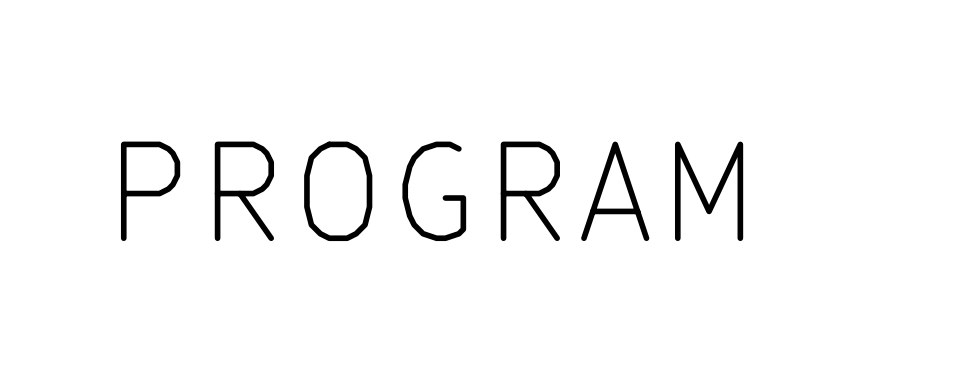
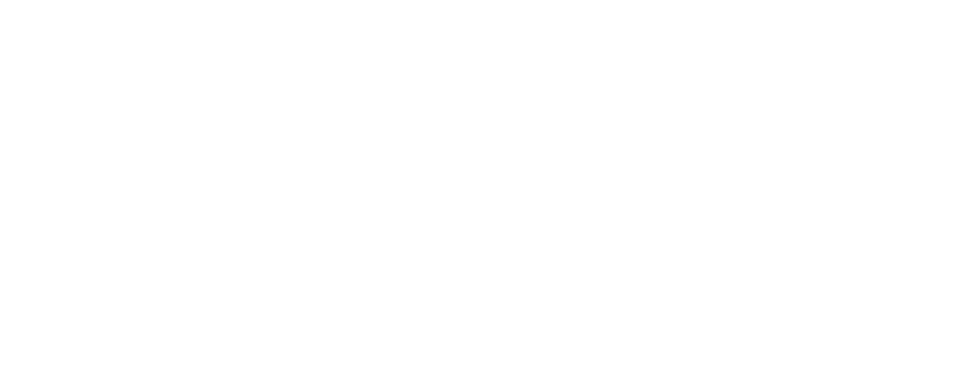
text: PROGRAM (432, 191) -> none

